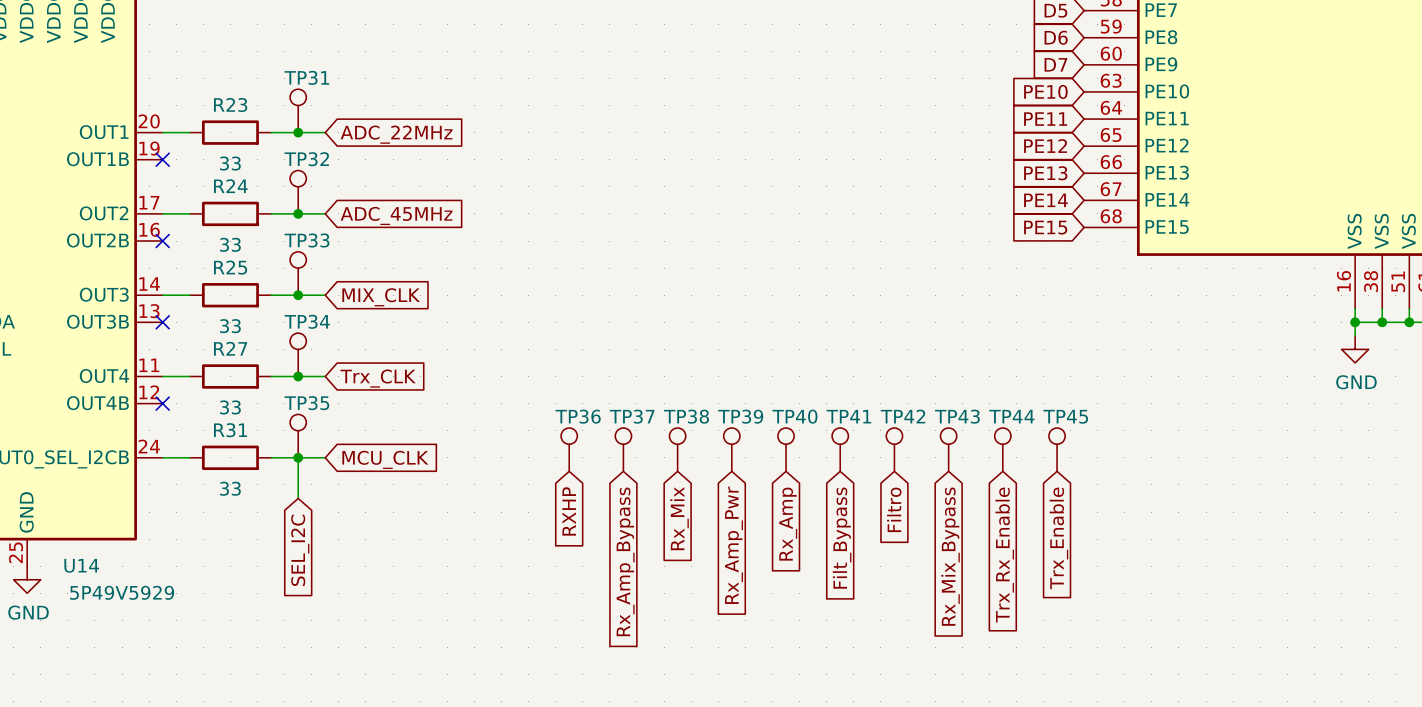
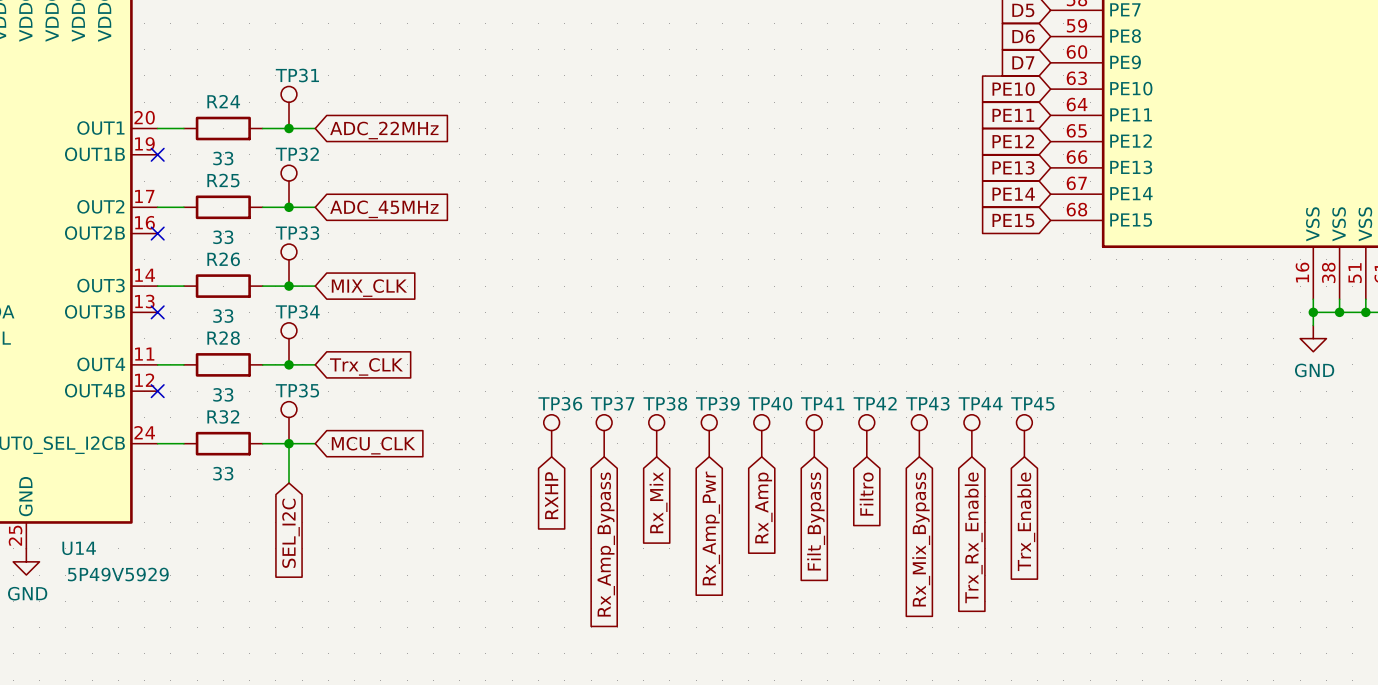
R23 name: R23 (230, 105) -> R24 (223, 101)
R24 name: R24 (230, 186) -> R25 (223, 180)
R25 name: R25 (230, 267) -> R26 (223, 259)
R27 name: R27 (230, 348) -> R28 (223, 338)
R31 name: R31 (230, 430) -> R32 (223, 416)

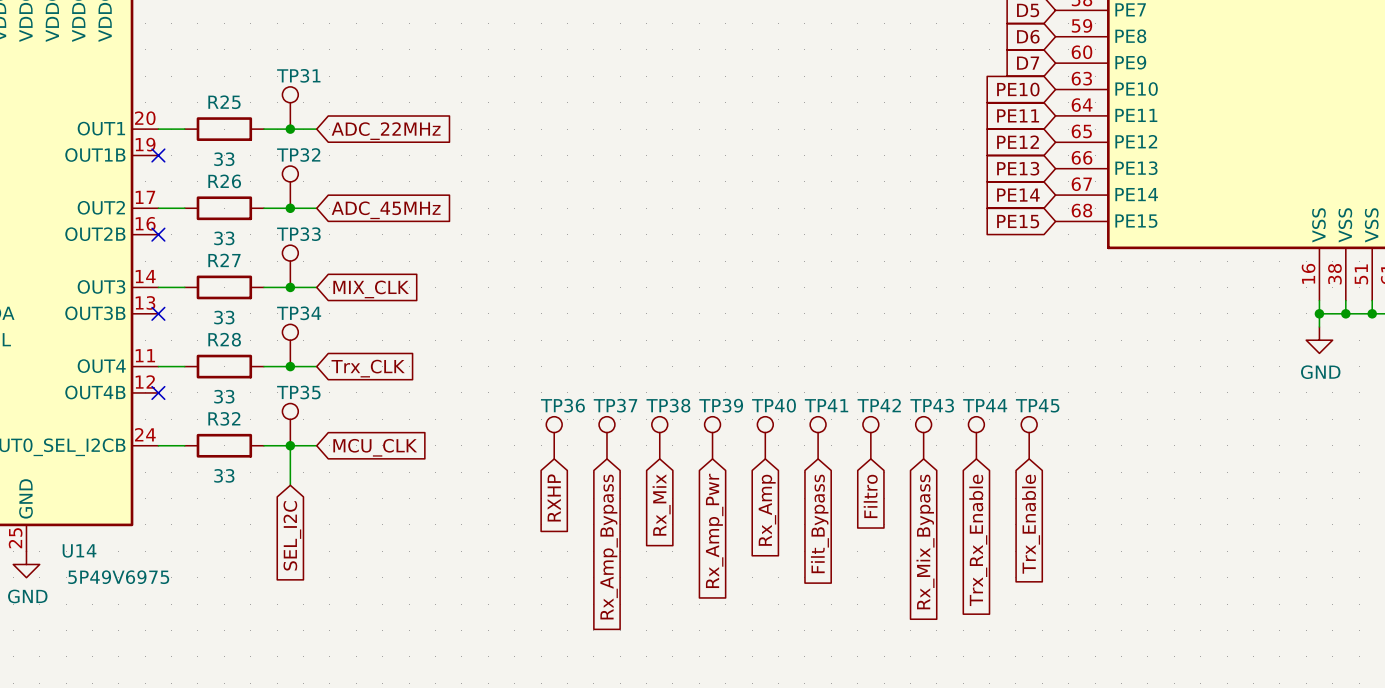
R24 name: R24 (223, 101) -> R25 (224, 102)
R25 name: R25 (223, 180) -> R26 (224, 181)
R26 name: R26 (223, 259) -> R27 (224, 260)
U14 value: 5P49V5929 (118, 574) -> 5P49V6975 (118, 577)

